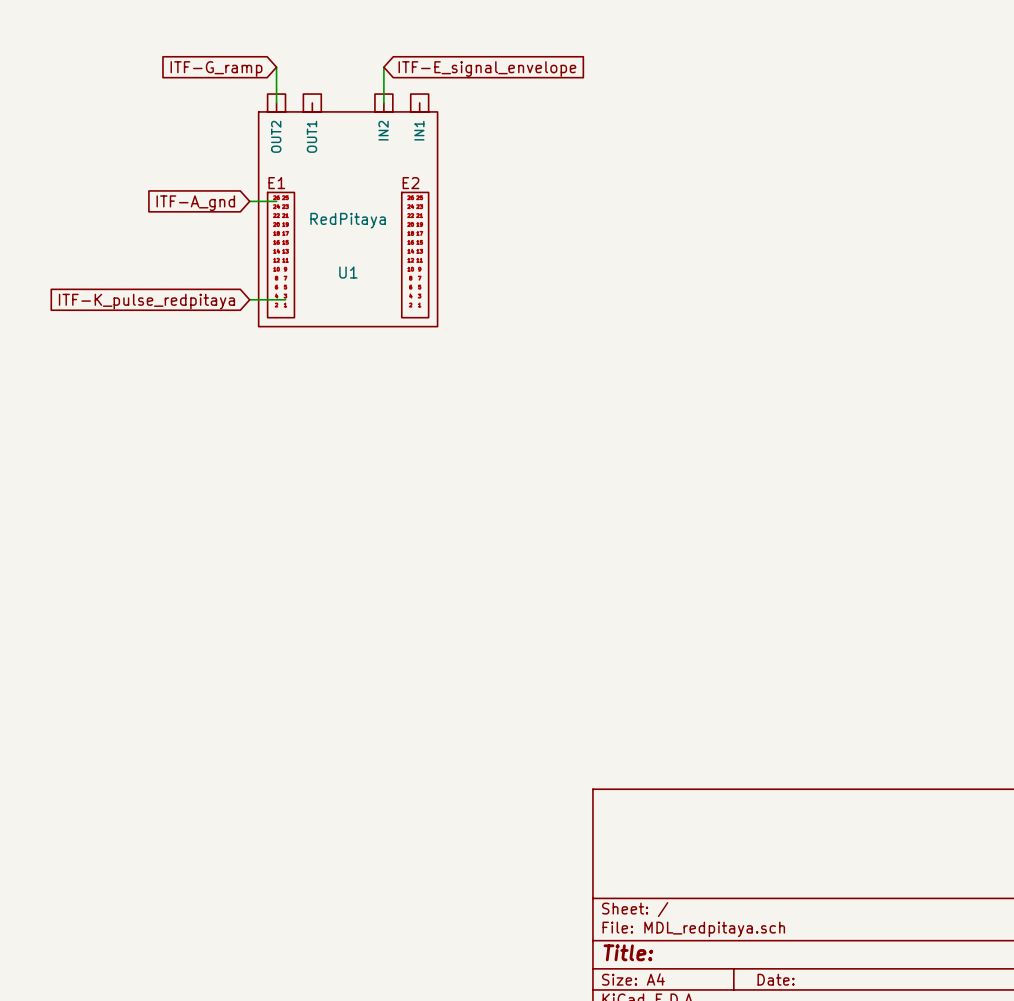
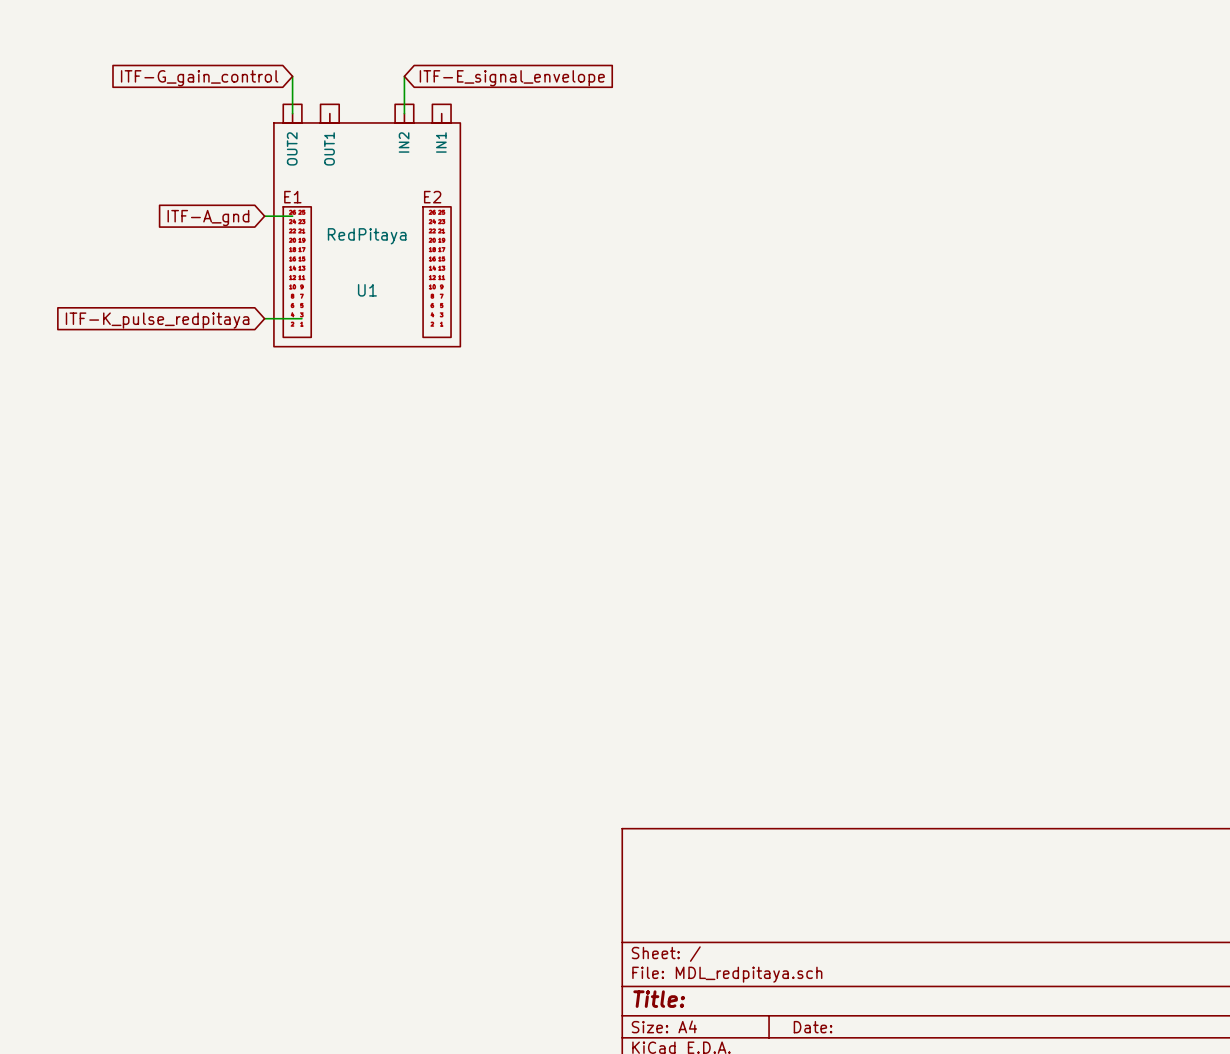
global label: ITF-G_ramp (216, 69) -> ITF-G_gain_control (199, 78)

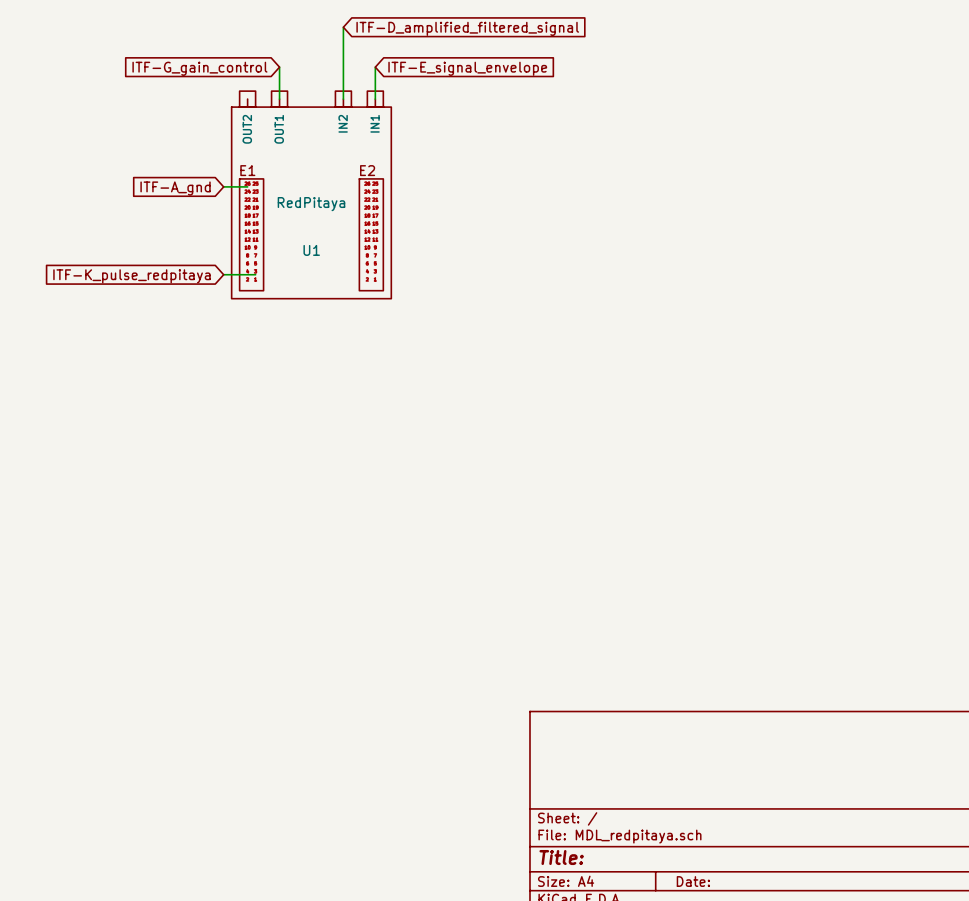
wire: none -> (343, 27) (343, 67)
global label: none -> ITF-D_amplified_filtered_signal (467, 28)
wire: (292, 76) (292, 113) -> (279, 67) (279, 99)
wire: none -> (375, 67) (375, 99)
global label position: ITF-G_gain_control (199, 78) -> ITF-G_gain_control (199, 68)
global label position: ITF-E_signal_envelope (512, 78) -> ITF-E_signal_envelope (467, 68)

